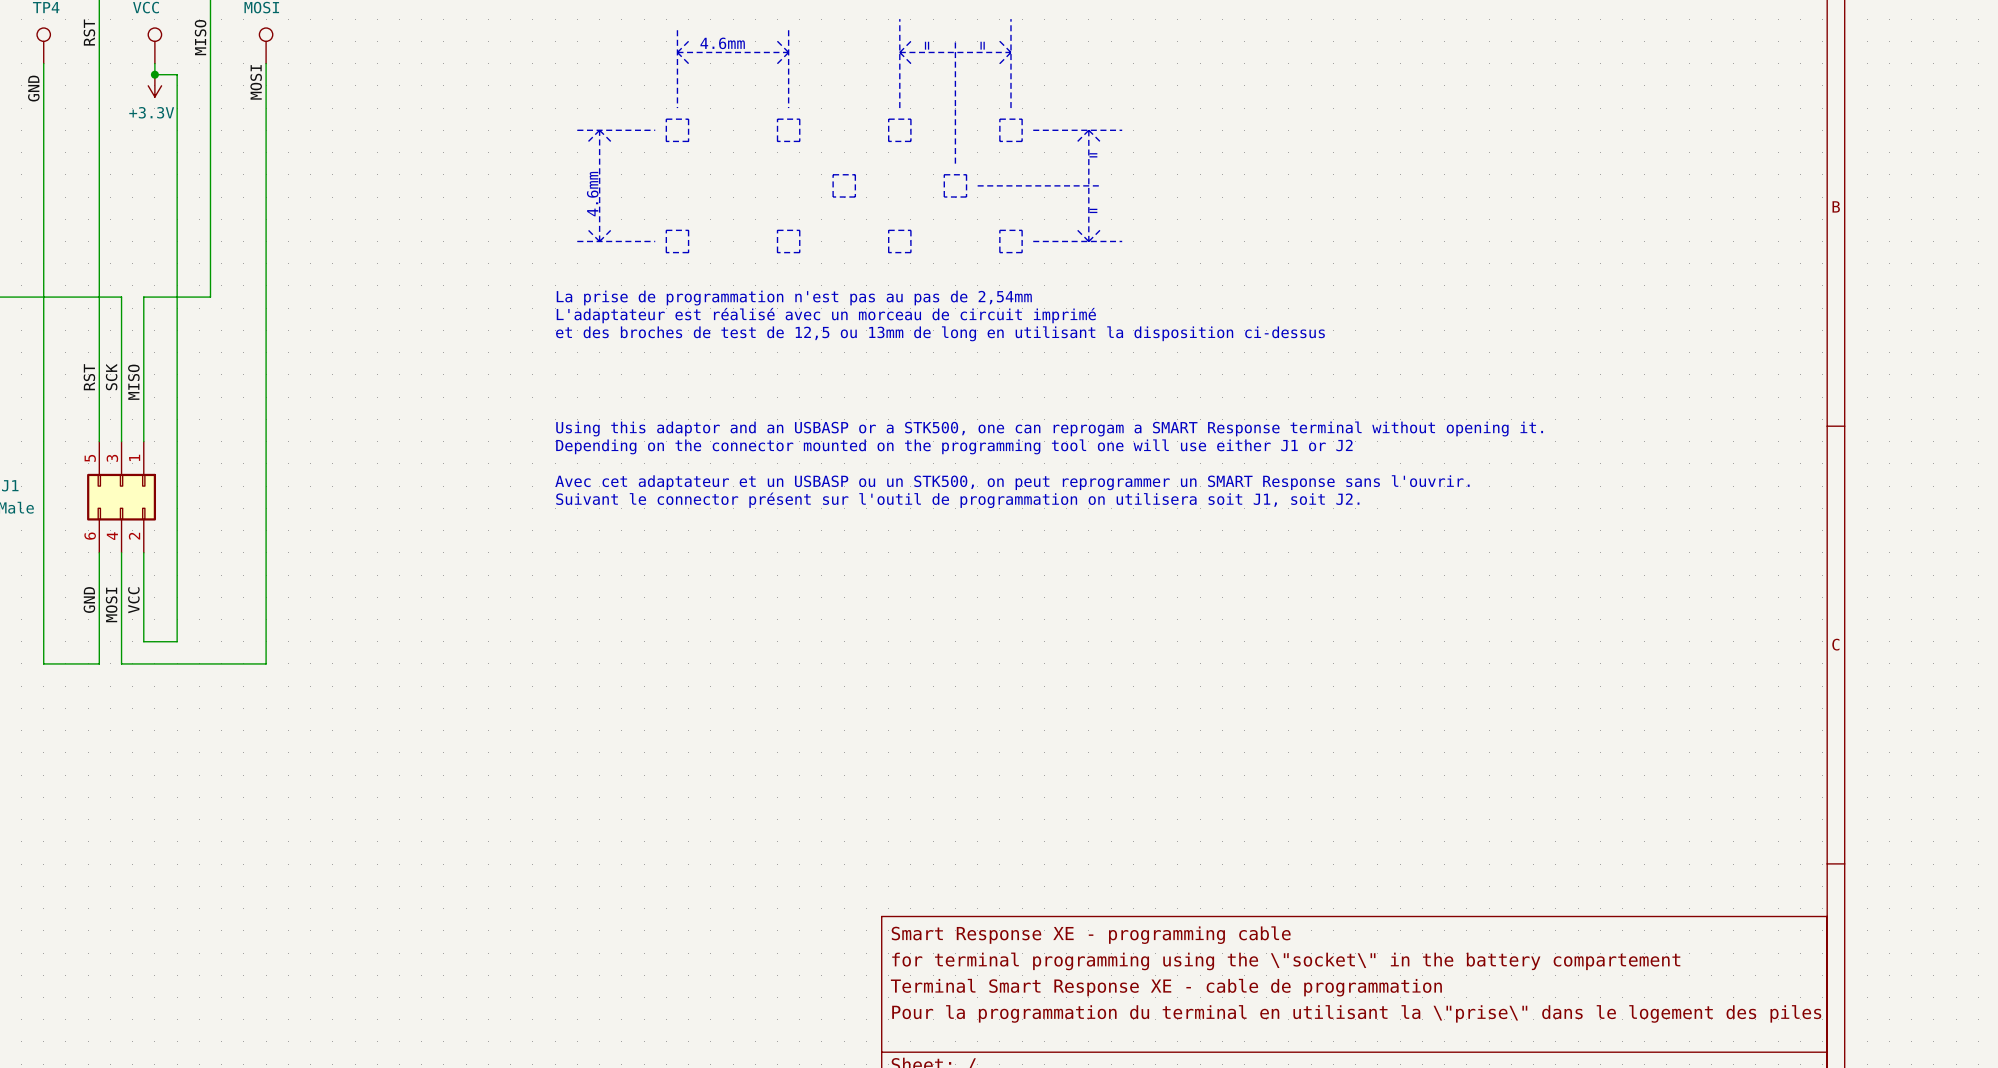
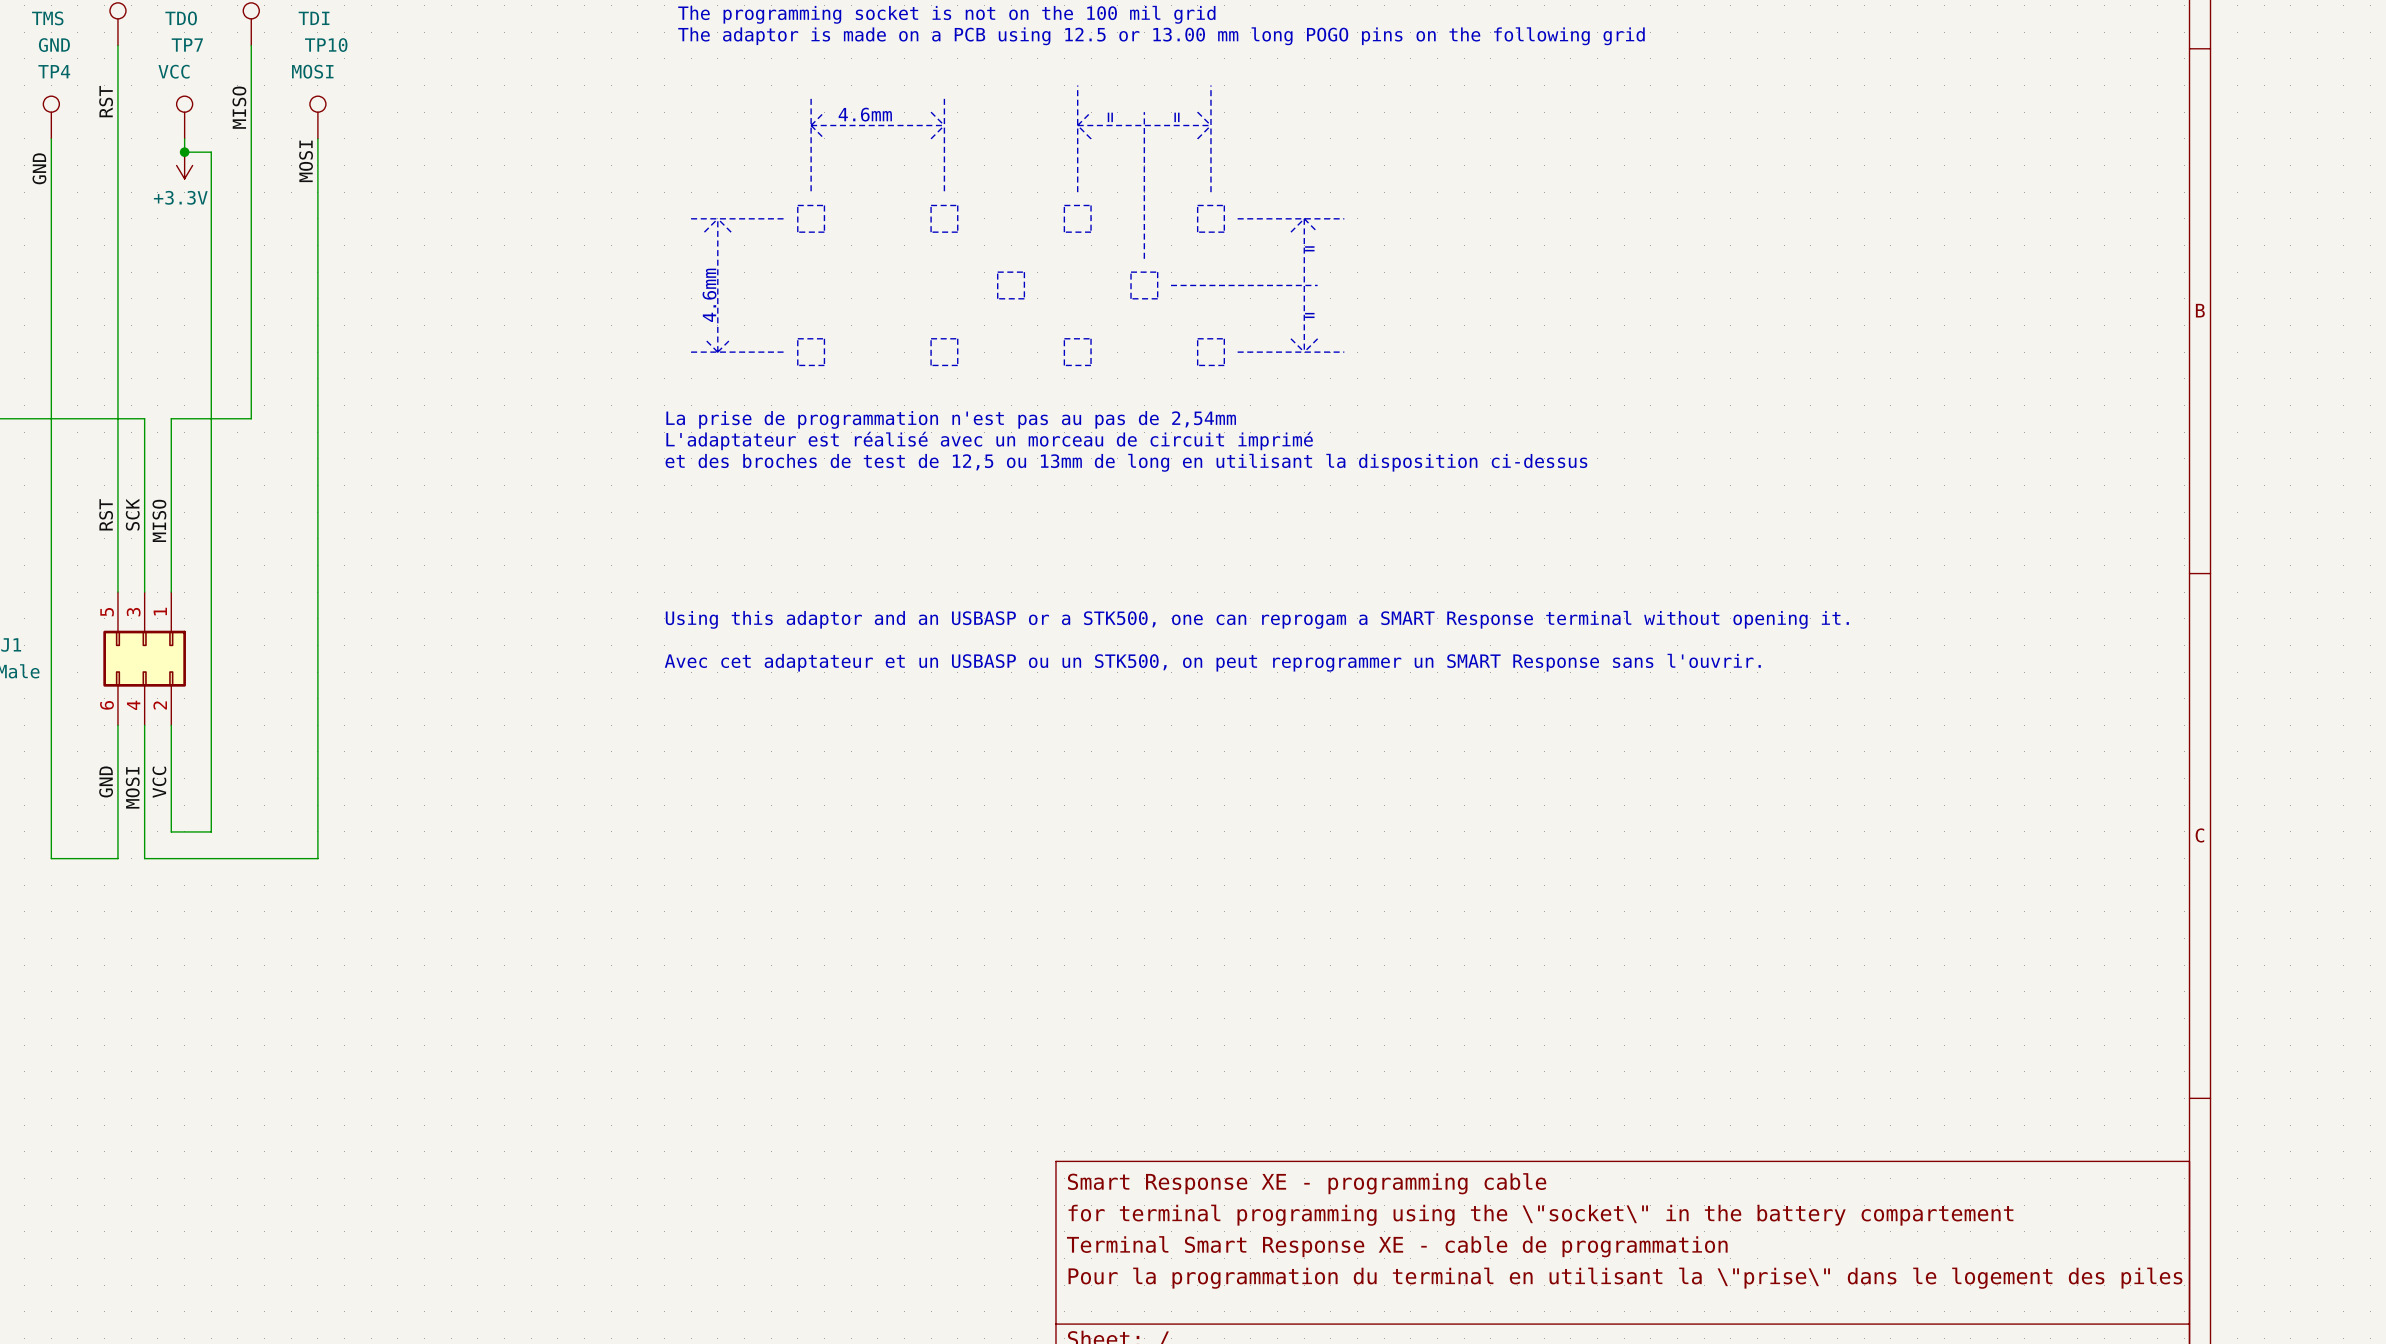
text position: Using this adaptor and an USBASP or a STK500, one can reprogam a SMART Response terminal without opening it. (1049, 428) -> Using this adaptor and an USBASP or a STK500, one can reprogam a SMART Response terminal without opening it. (1257, 619)
text: Depending on the connector mounted on the programming tool one will use either J1 or J2 (954, 446) -> none
text: Avec cet adaptateur et un USBASP ou un STK500, on peut reprogrammer un SMART Response sans l'ouvrir. (1012, 482) -> none
text: Suivant le connector présent sur l'outil de programmation on utilisera soit J1, soit J2. (957, 500) -> Avec cet adaptateur et un USBASP ou un STK500, on peut reprogrammer un SMART Response sans l'ouvrir. (1212, 662)

